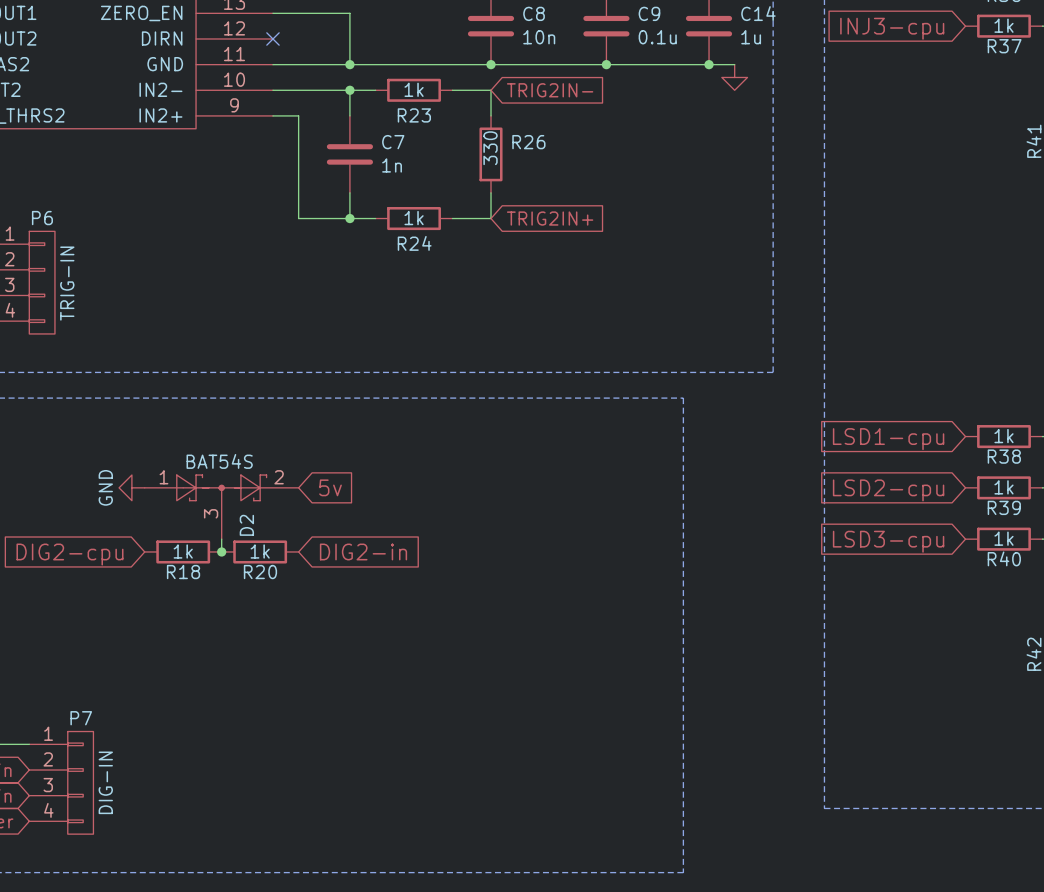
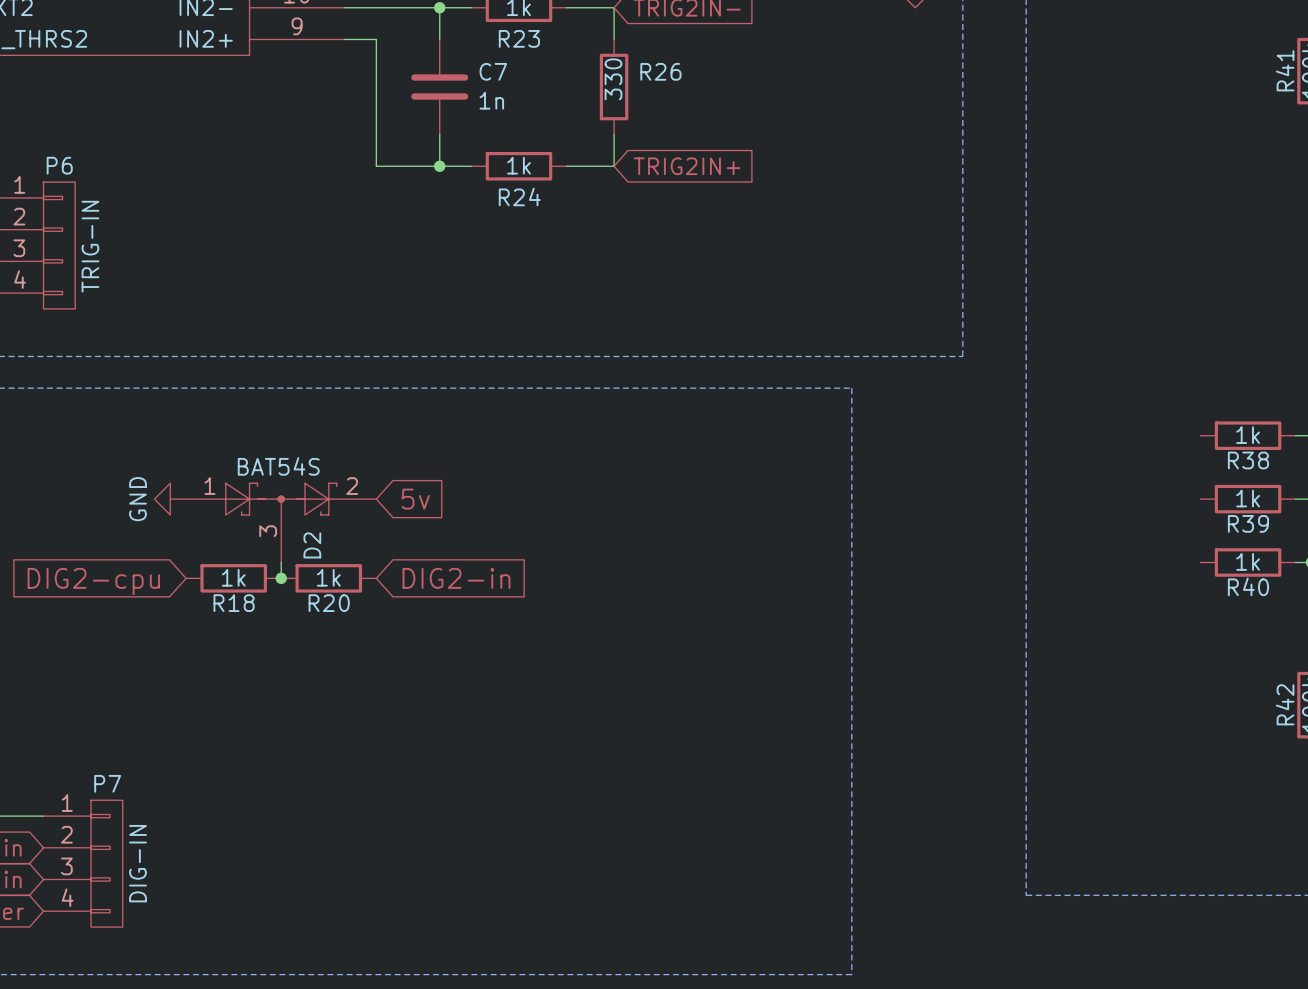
global label: LSD1-cpu (888, 439) -> none
global label: LSD2-cpu (888, 490) -> none
global label: LSD3-cpu (888, 541) -> none

